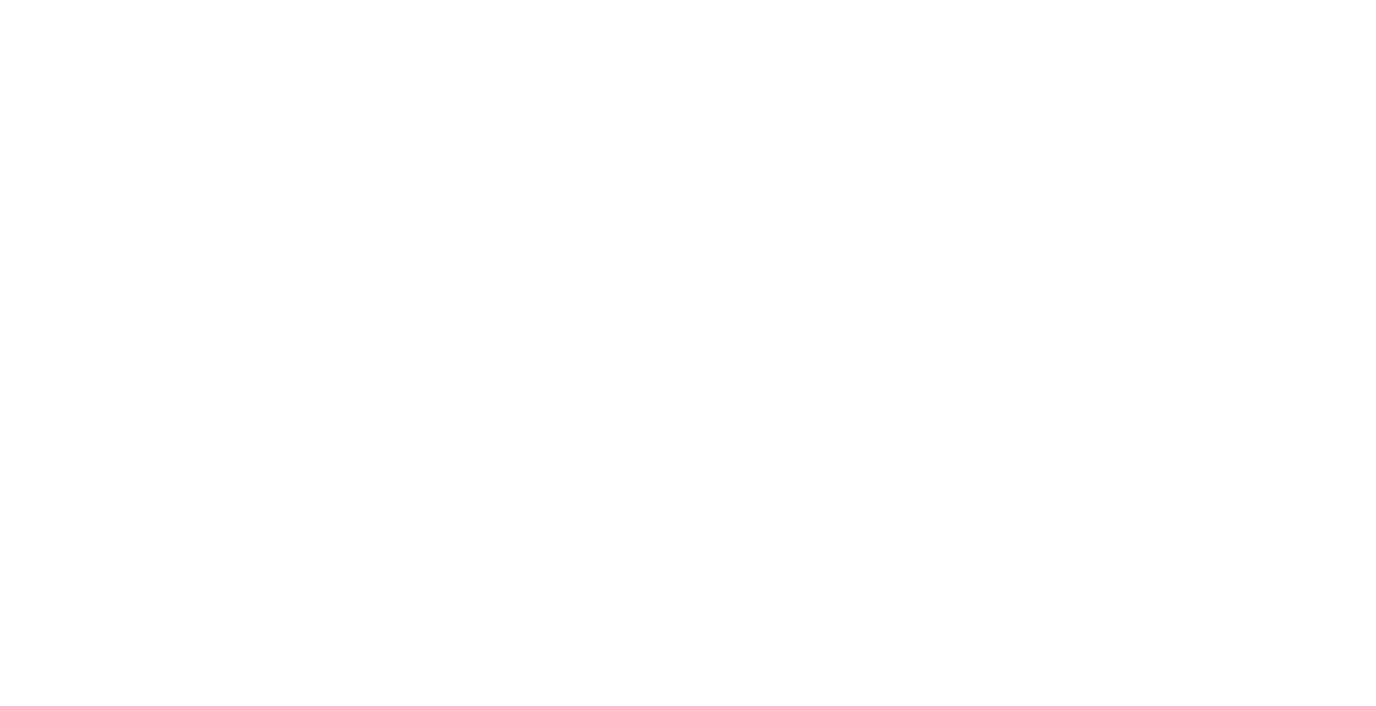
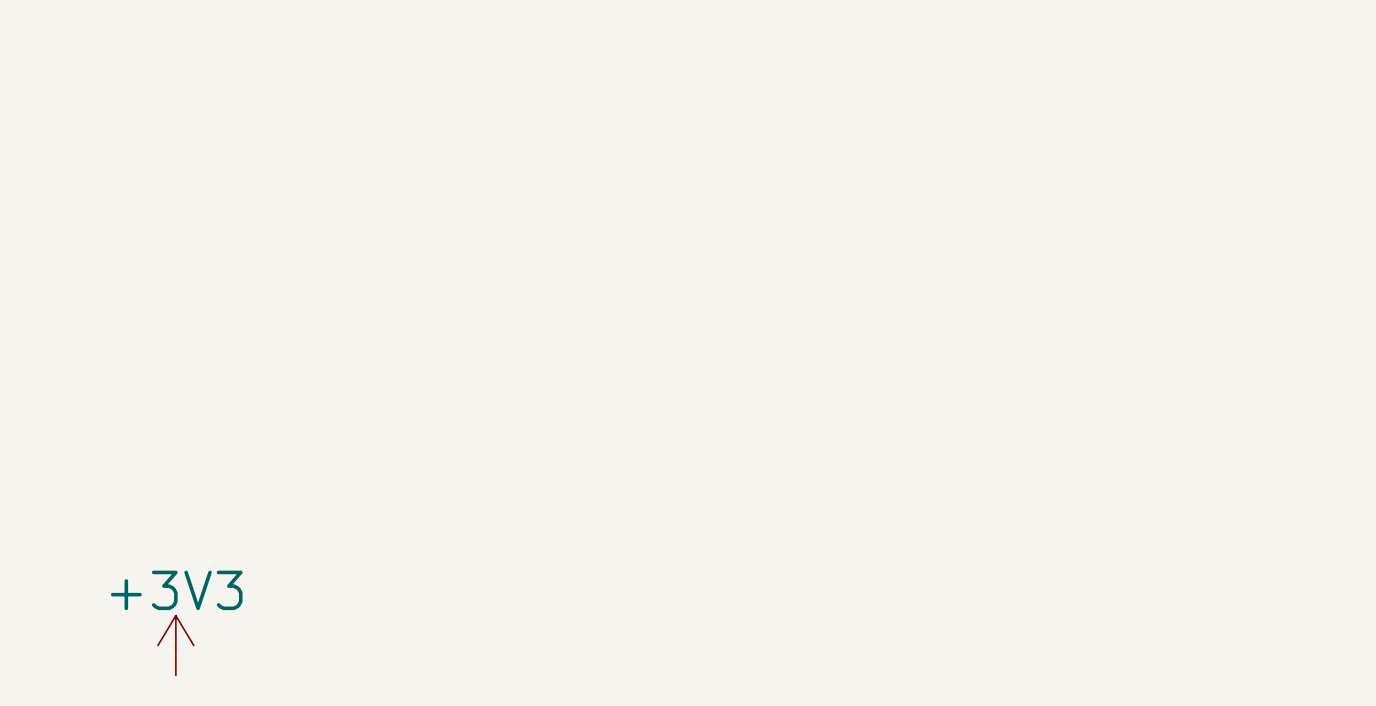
power symbol: none -> +3V3 (175, 645)

